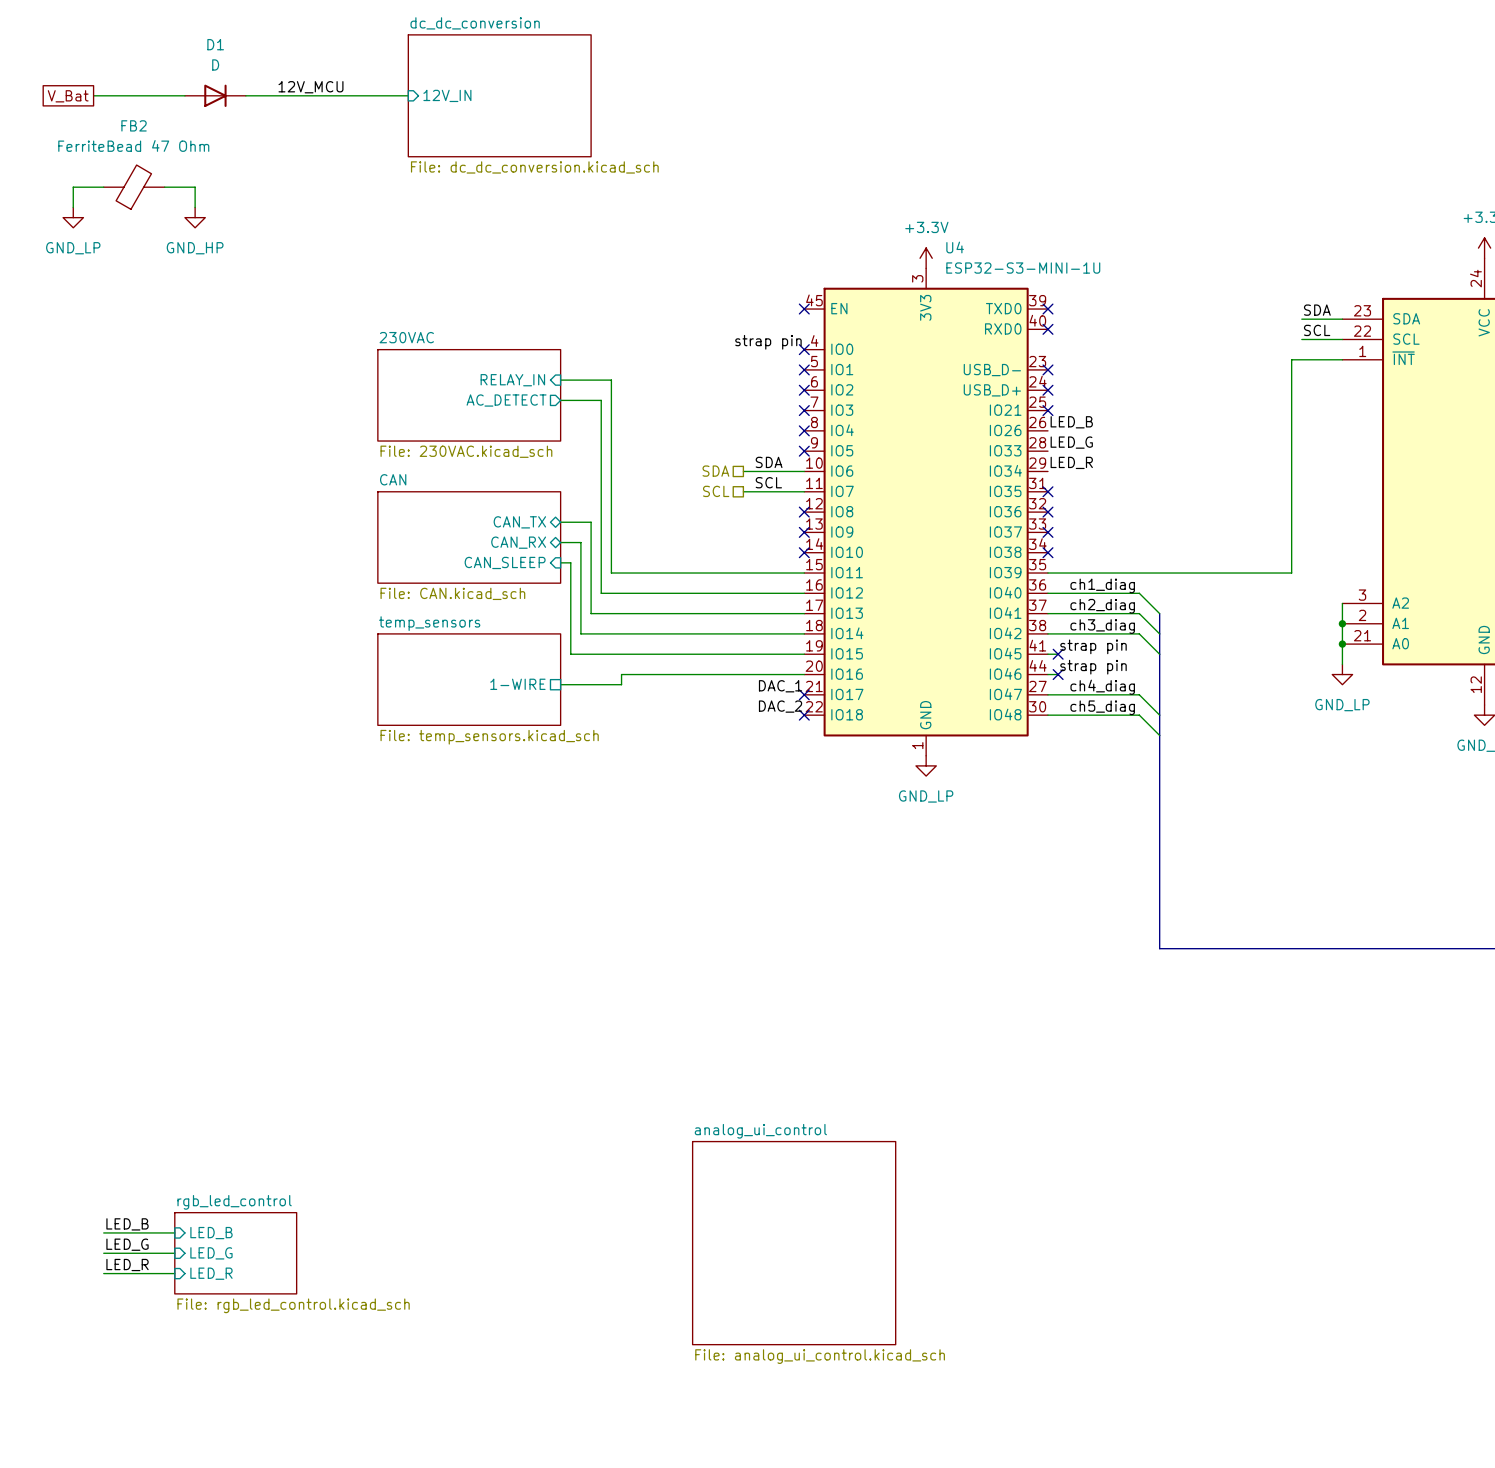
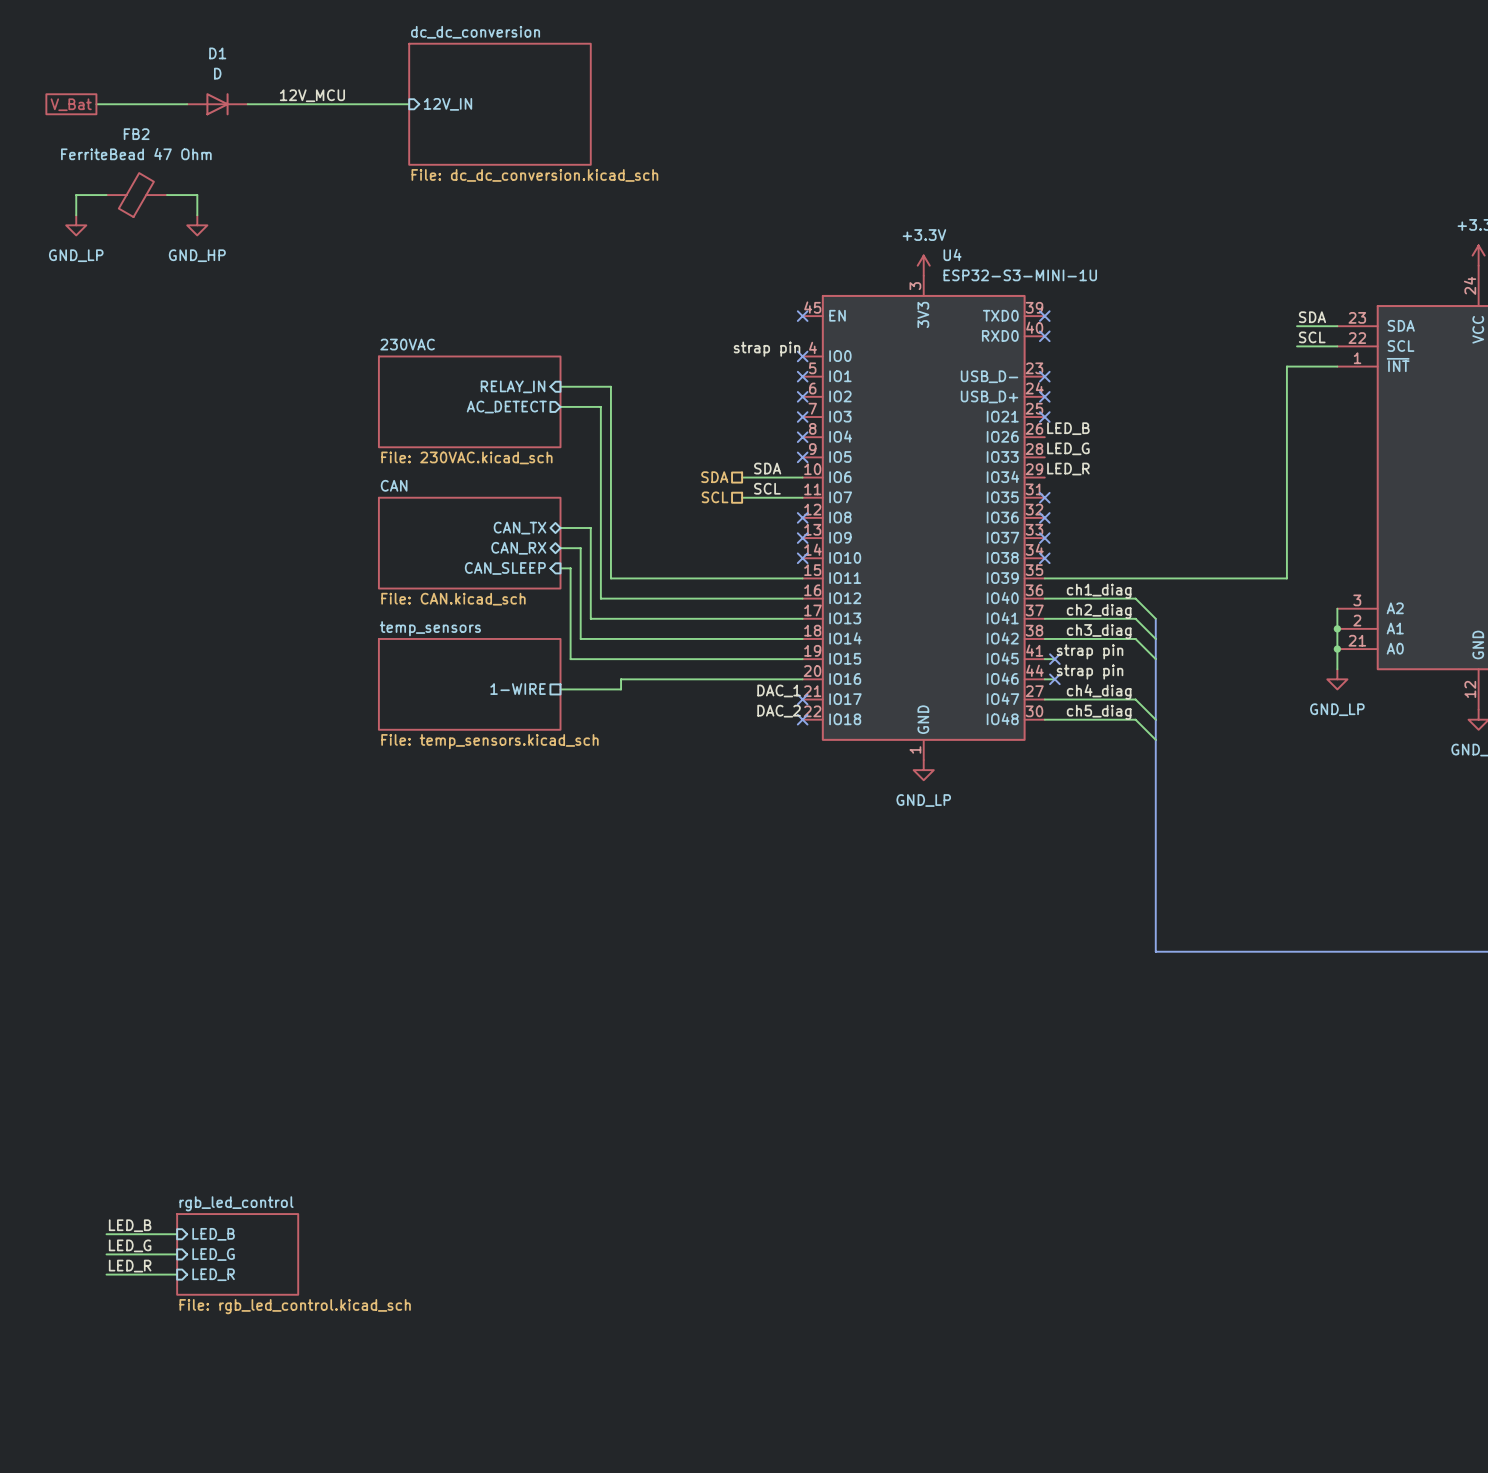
sheet analog_ui_control: File: analog_ui_control.kicad_sch (794, 1243) -> none

